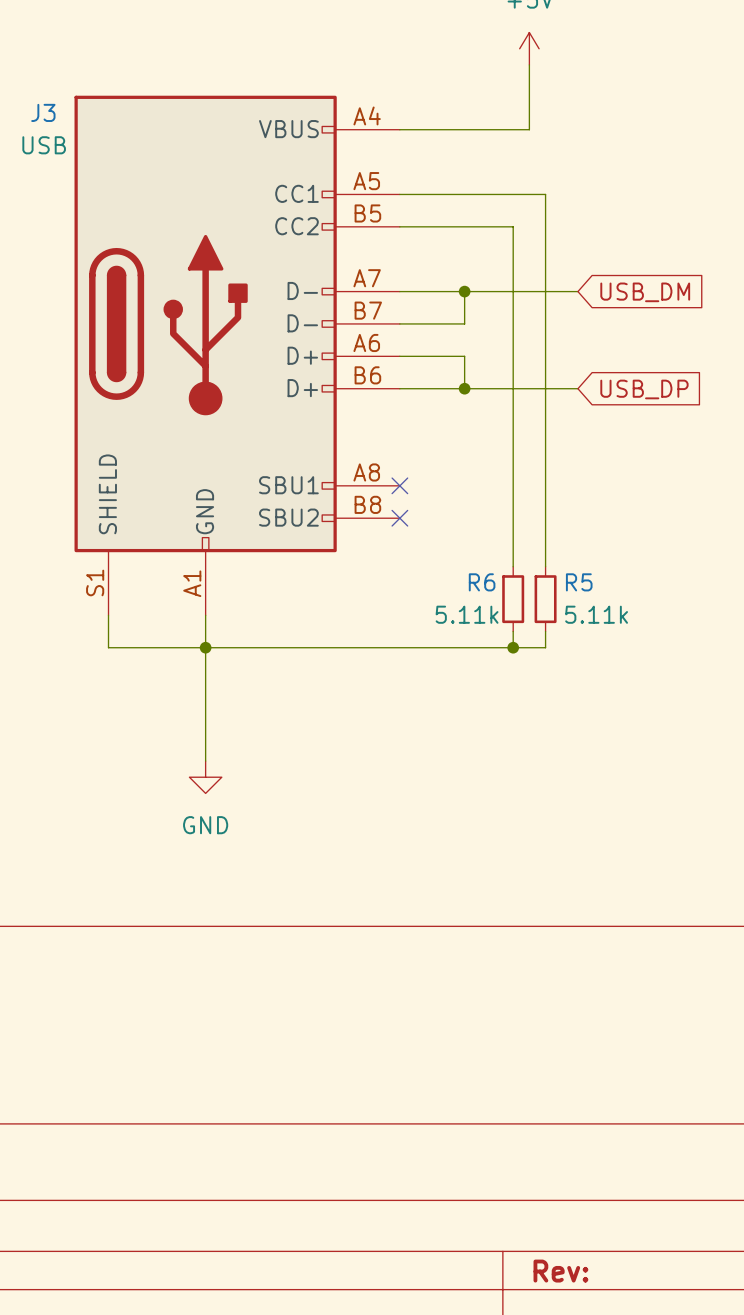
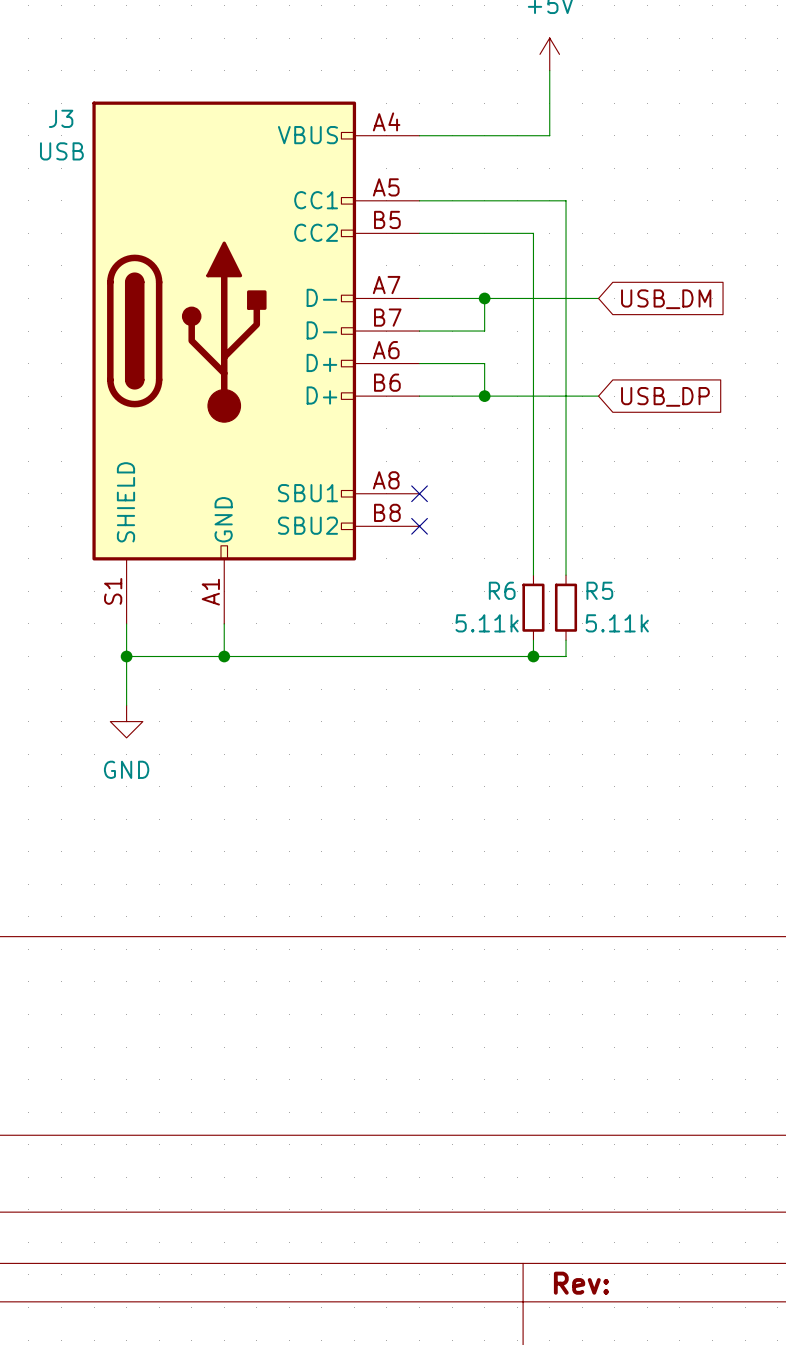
wire: none -> (126, 656) (126, 705)
junction: none -> (126, 656)
wire: (205, 647) (205, 761) -> none
power symbol position: GND (205, 777) -> GND (126, 721)

